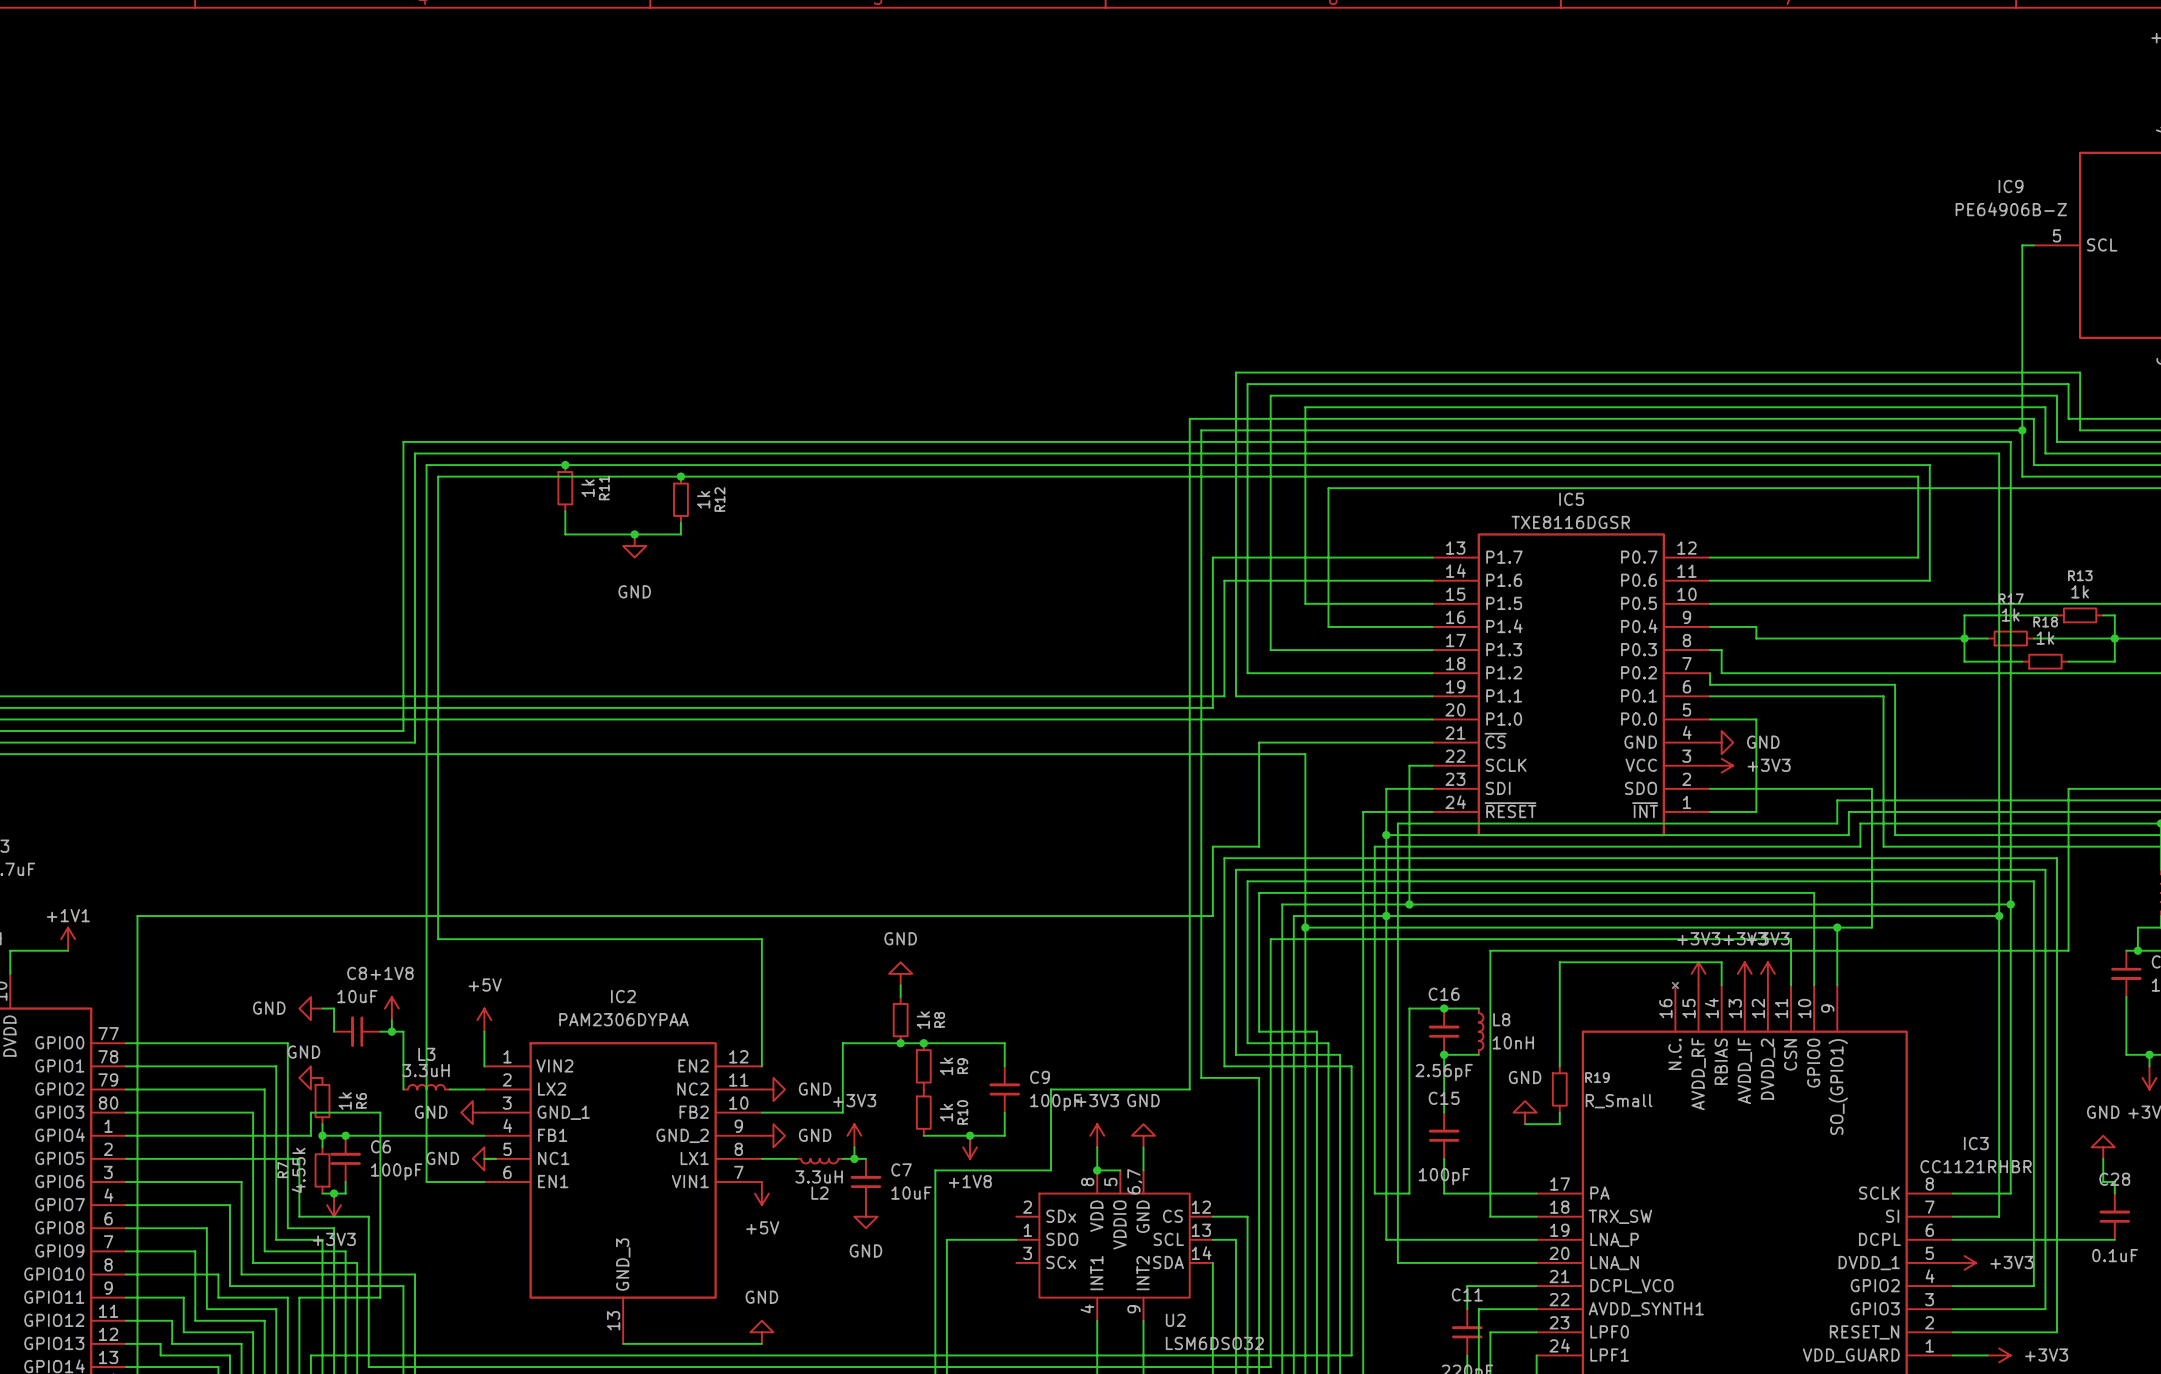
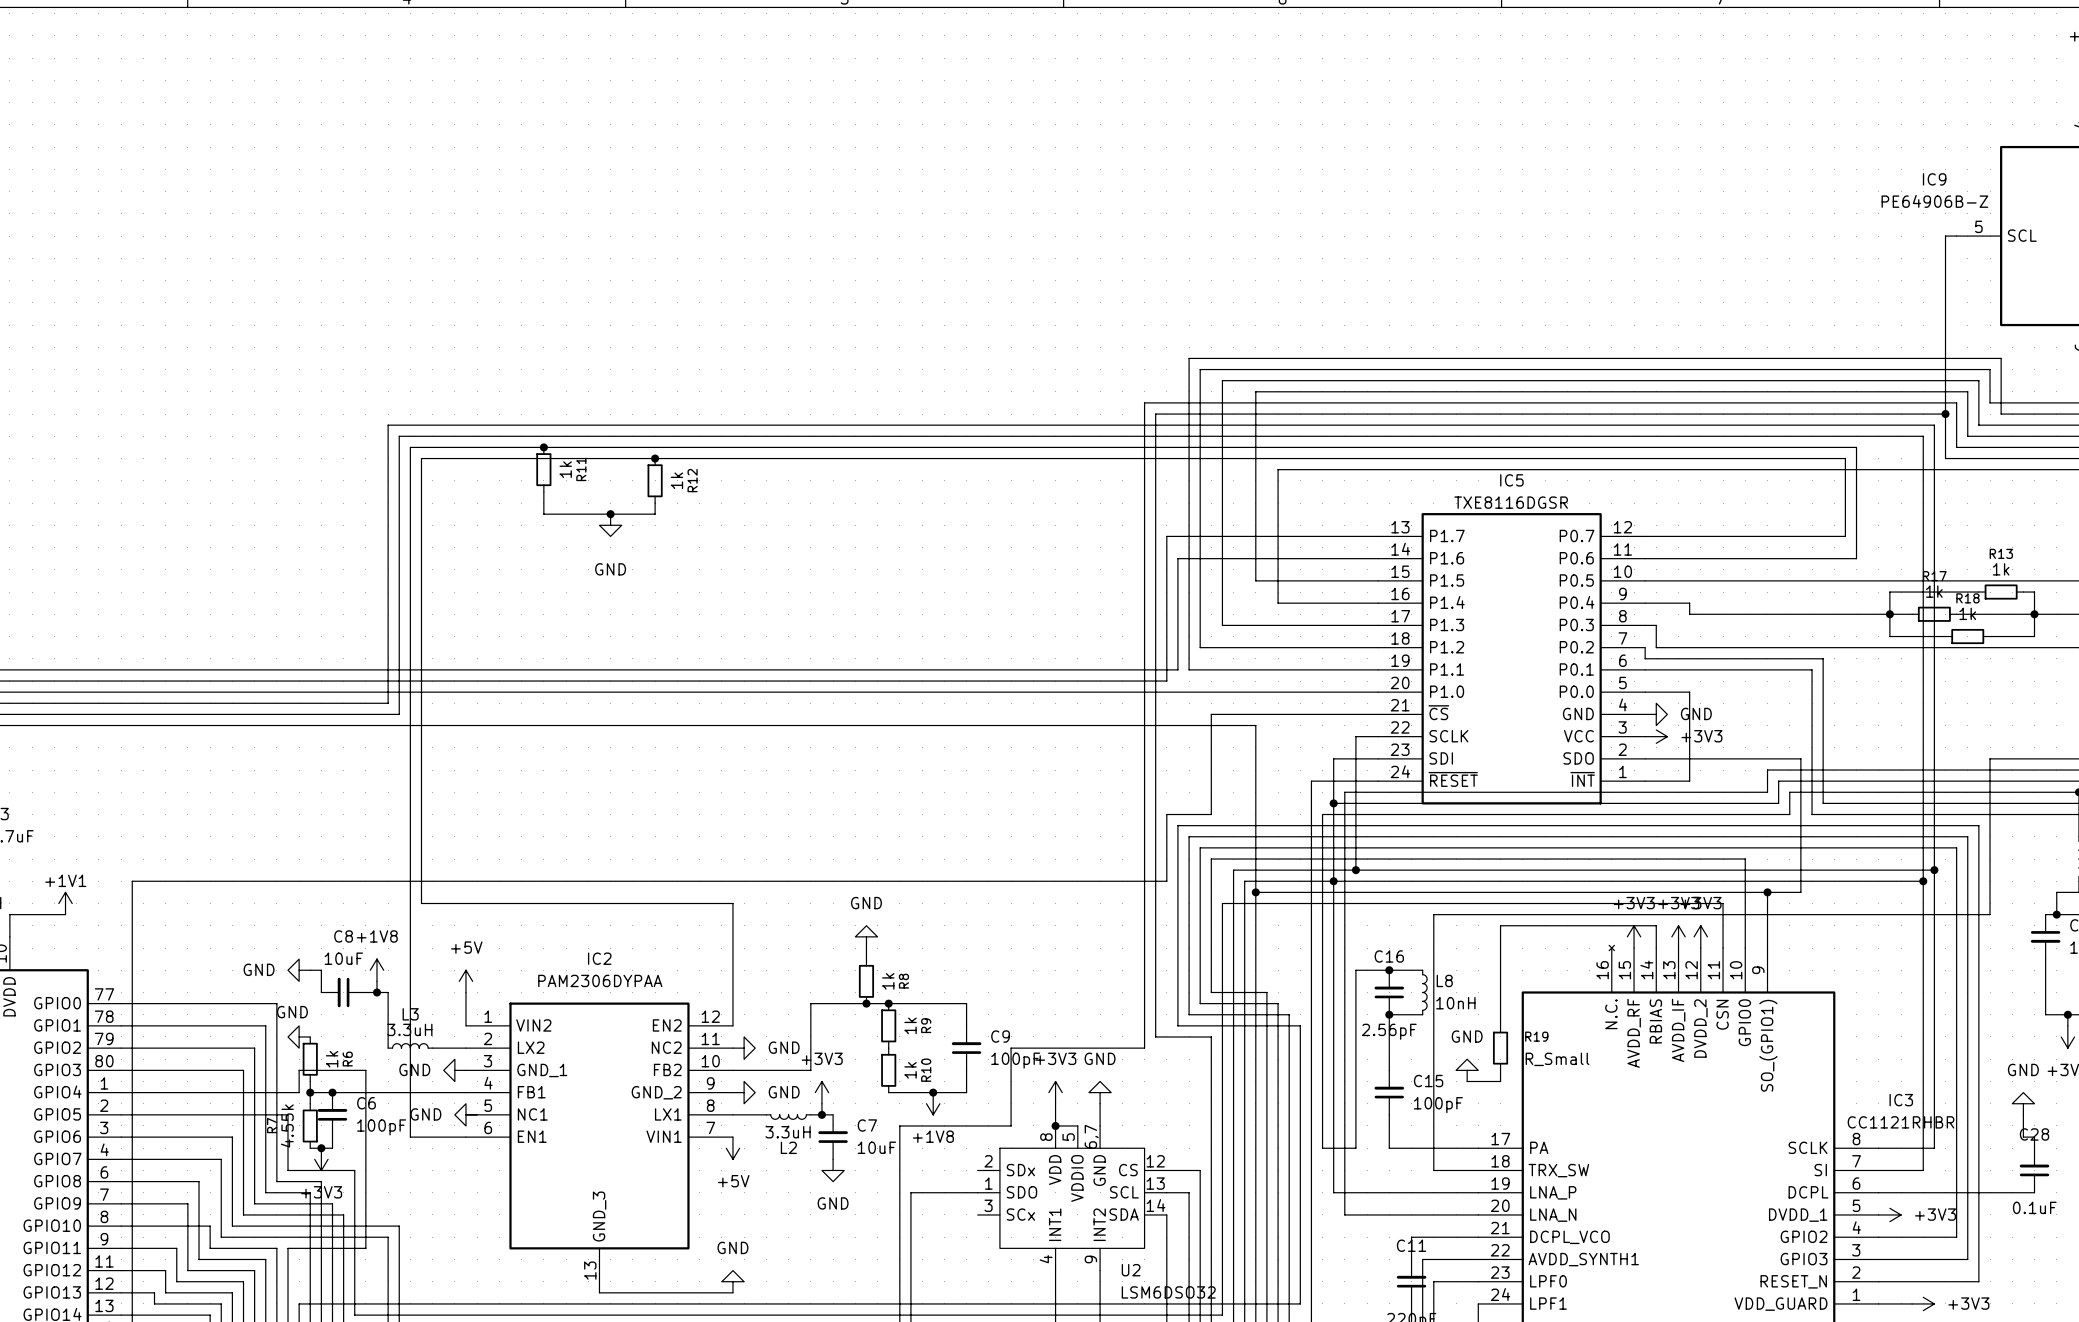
C15 name position: C15 (1444, 1098) -> C15 (1428, 1081)
C15 value position: 100pF (1444, 1176) -> 100pF (1438, 1105)

